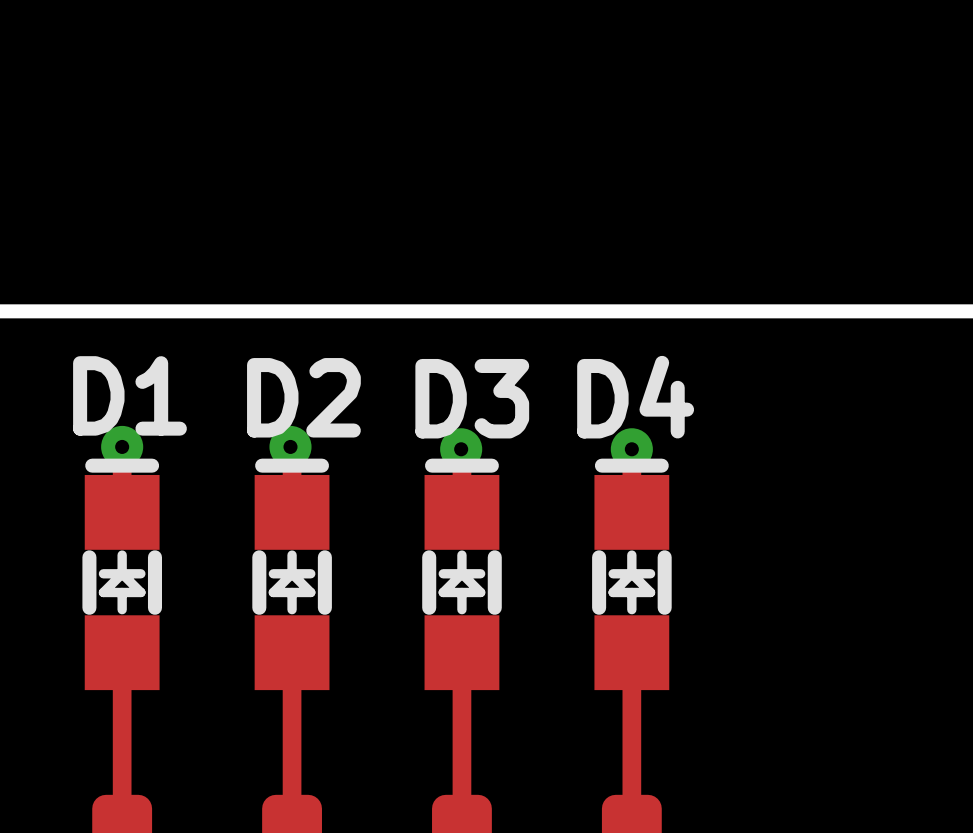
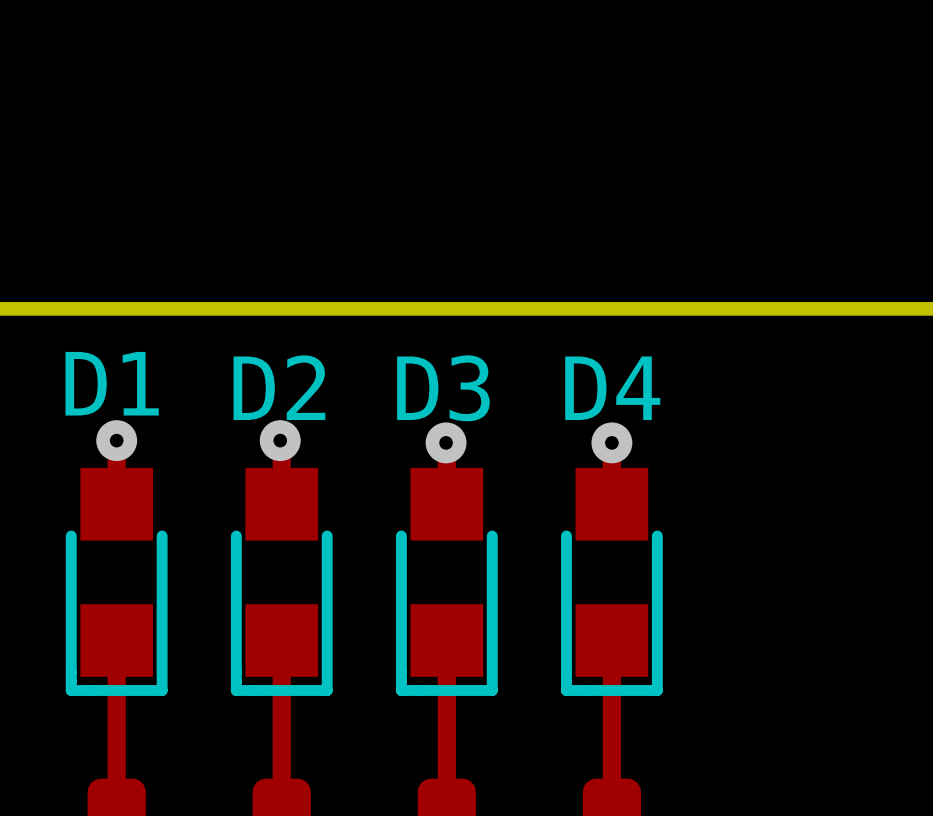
D1 footprint: [82, 458, 163, 691] -> [65, 467, 168, 696]
D2 footprint: [252, 458, 332, 691] -> [230, 467, 333, 696]
D3 footprint: [422, 458, 502, 691] -> [395, 467, 498, 696]
D4 footprint: [592, 458, 672, 691] -> [561, 467, 663, 696]

